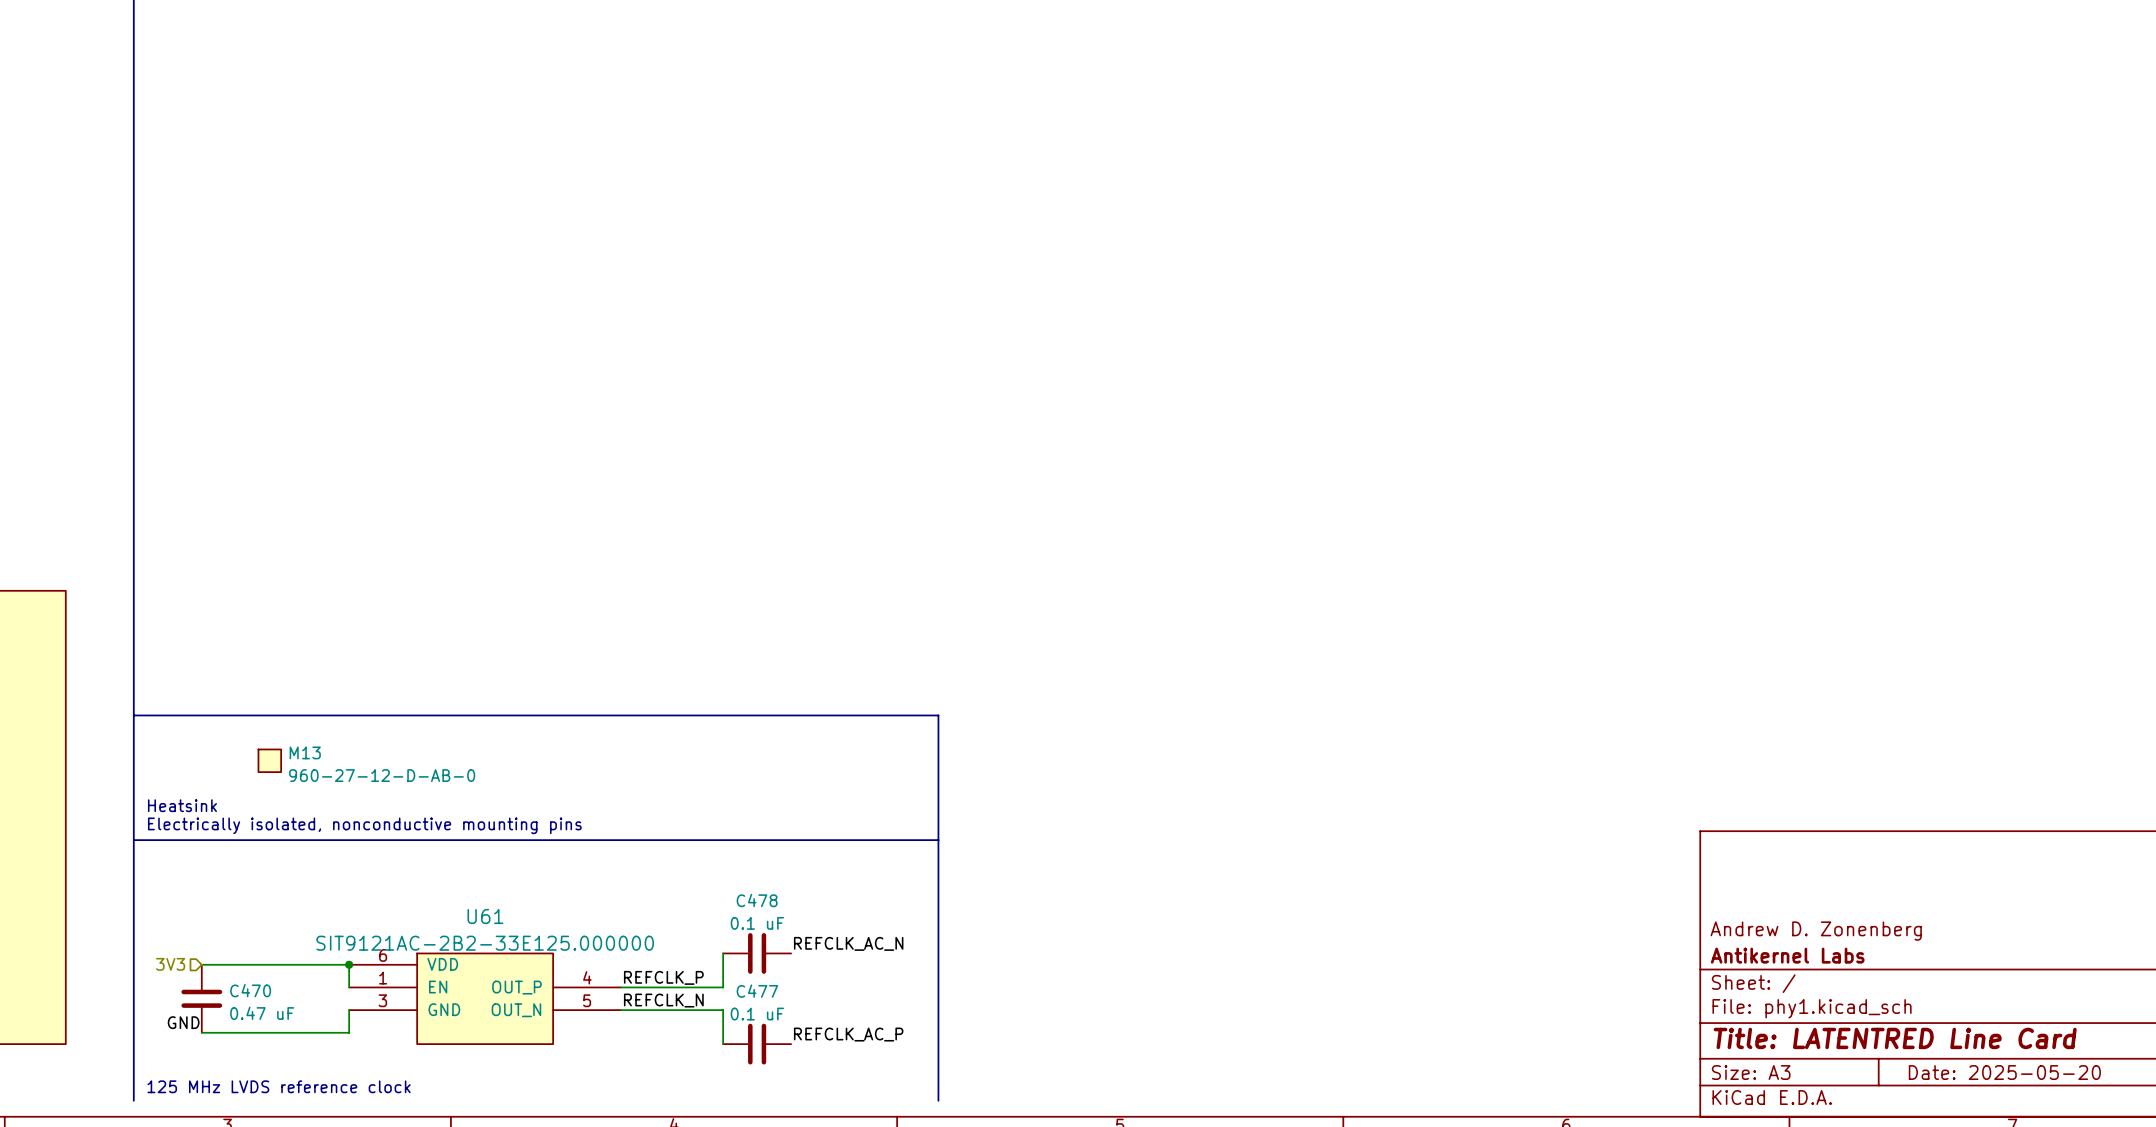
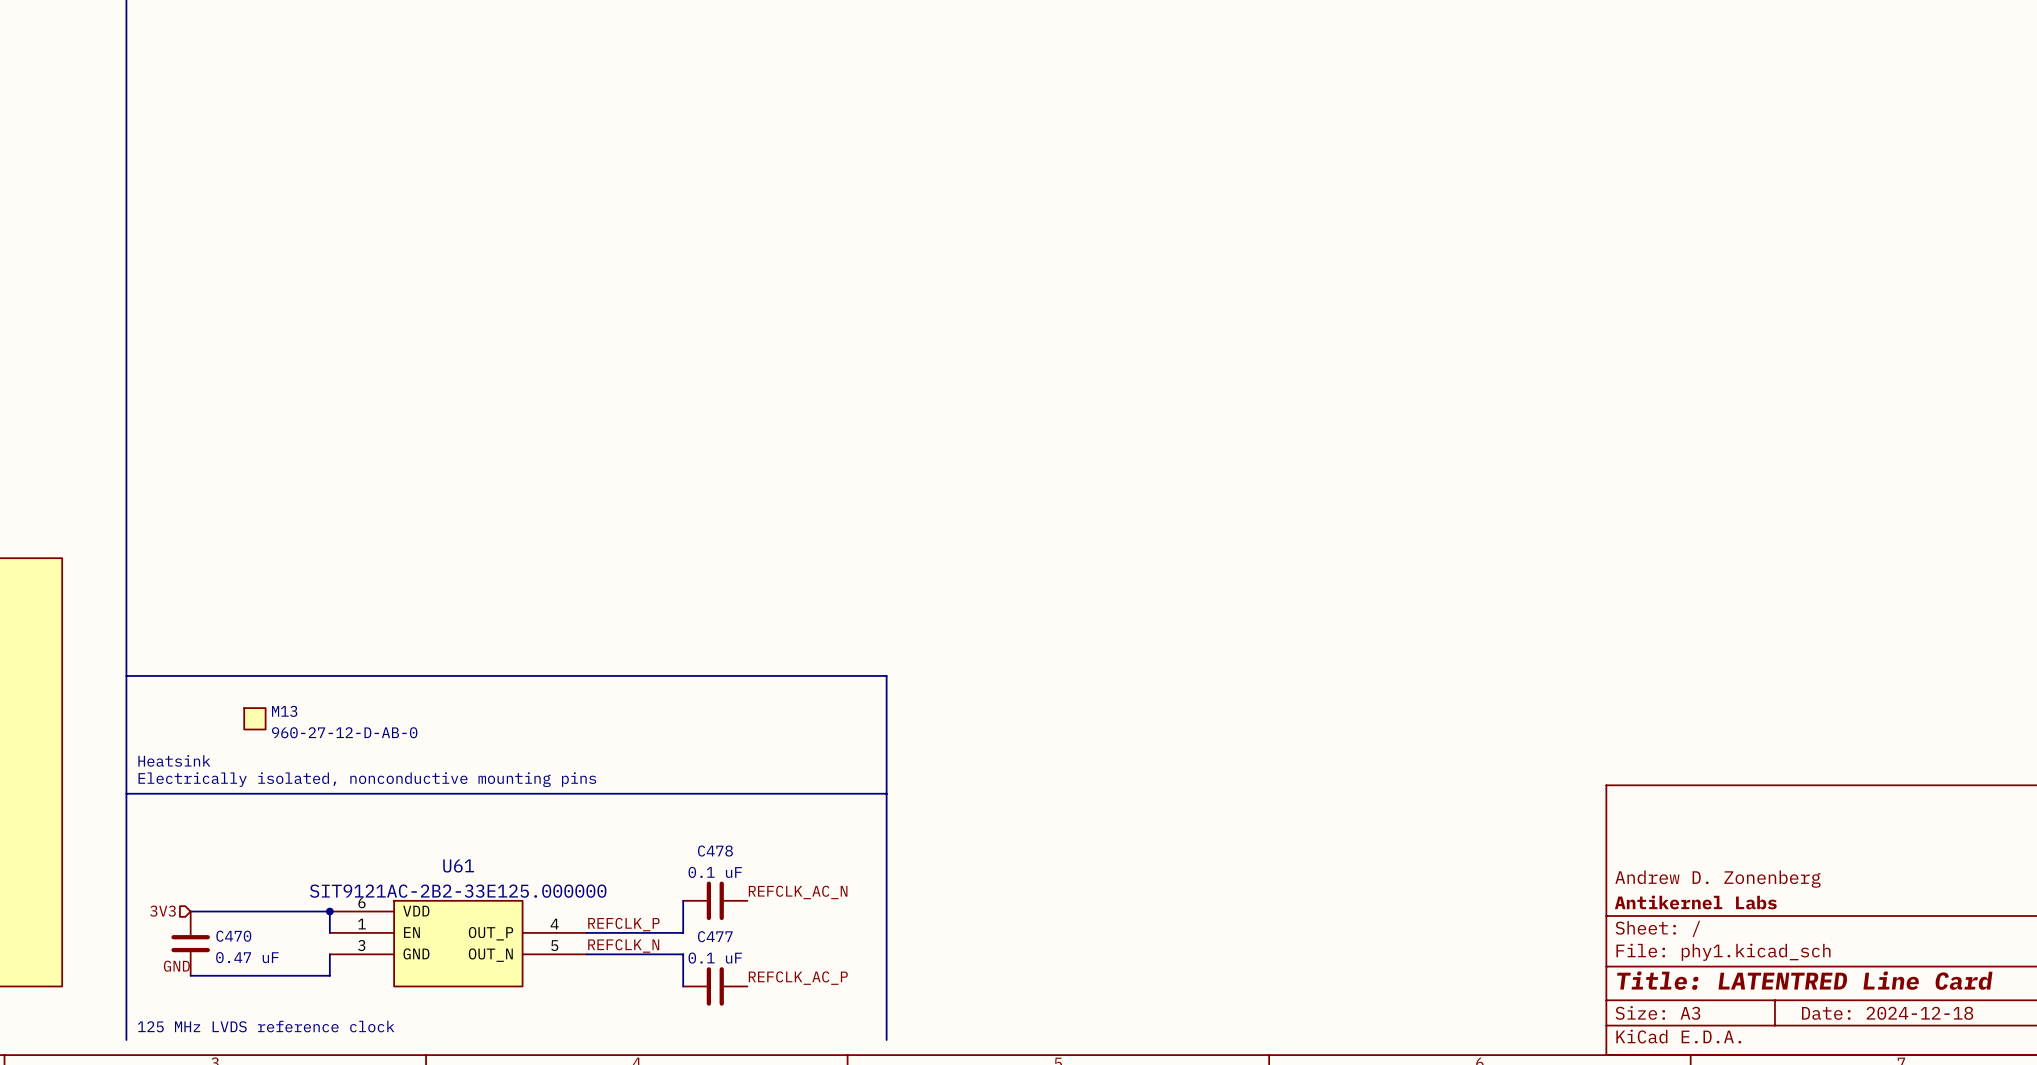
title block: Date: 2025-05-20 (2004, 1072) -> Date: 2024-12-18 (1887, 1013)

